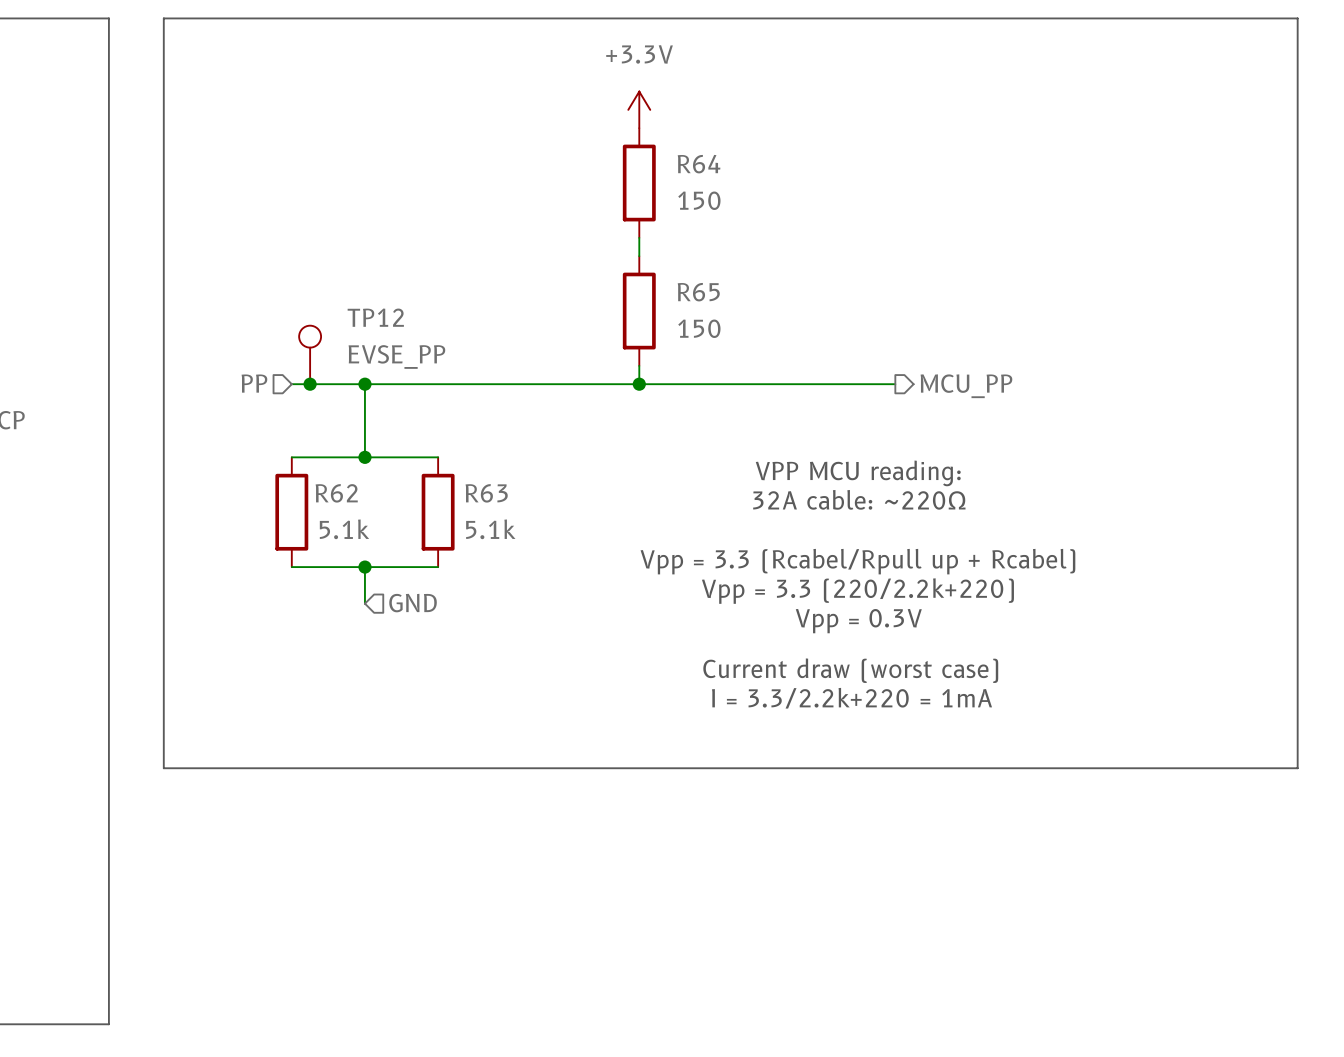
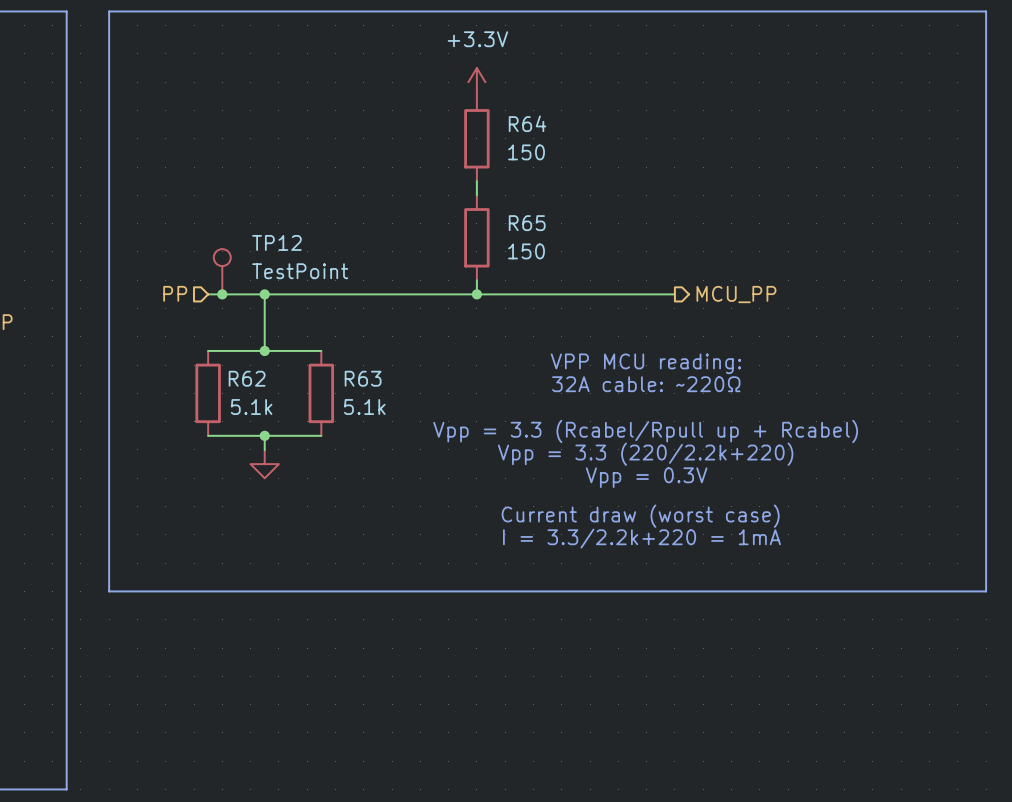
TP12 value: EVSE_PP (396, 356) -> TestPoint (300, 271)
power symbol: none -> (264, 464)
hierarchical label: GND (413, 603) -> none

